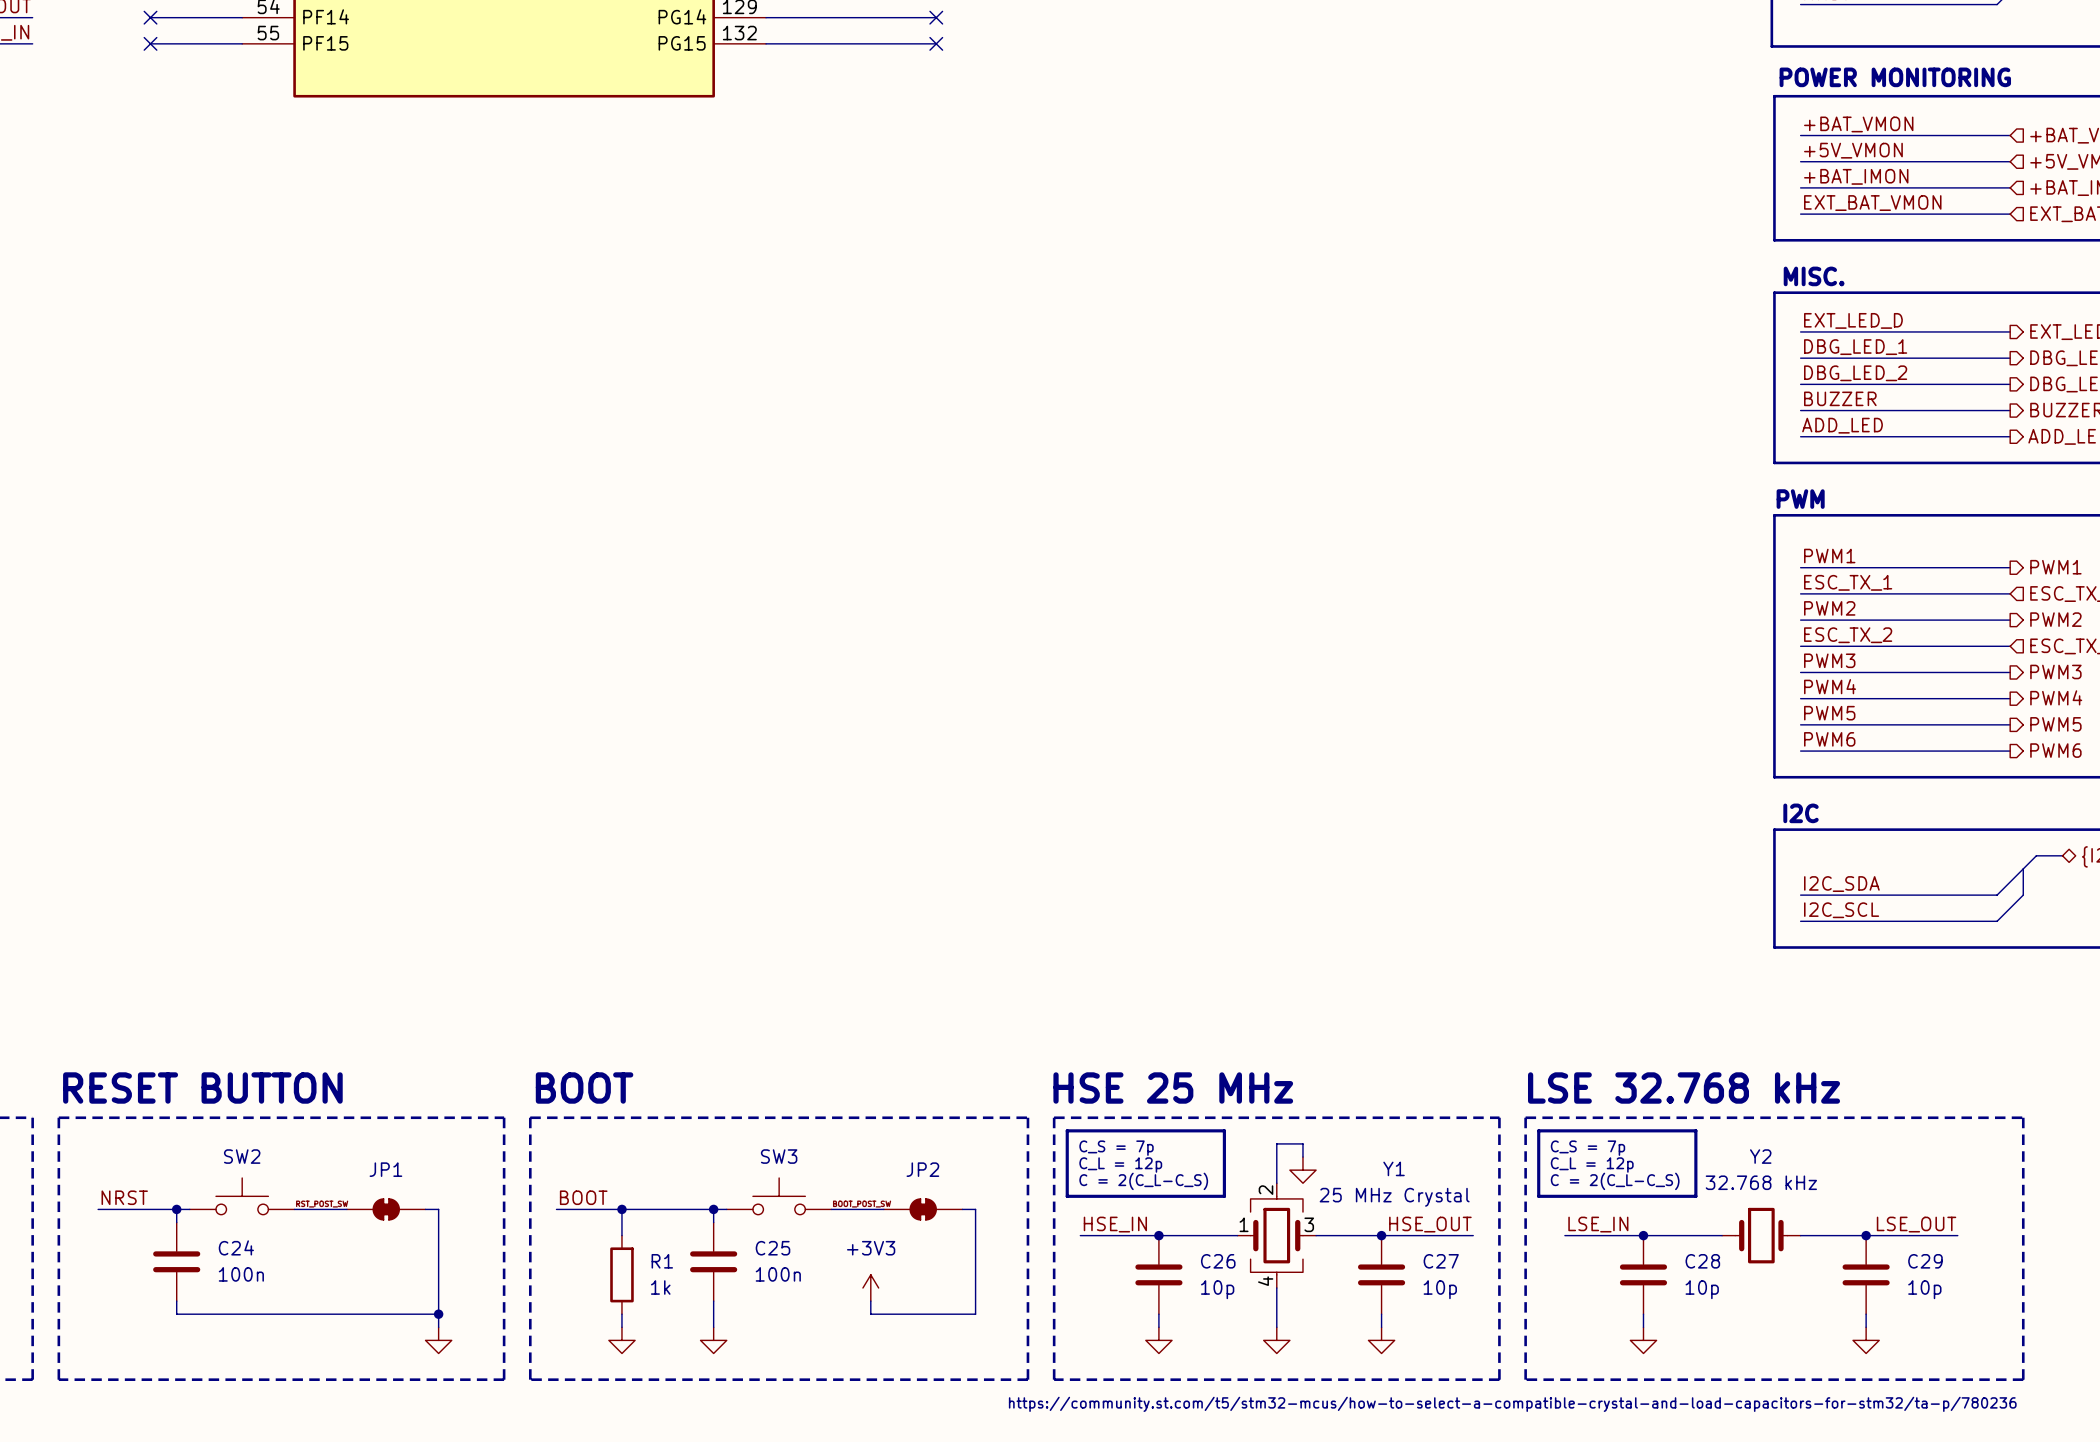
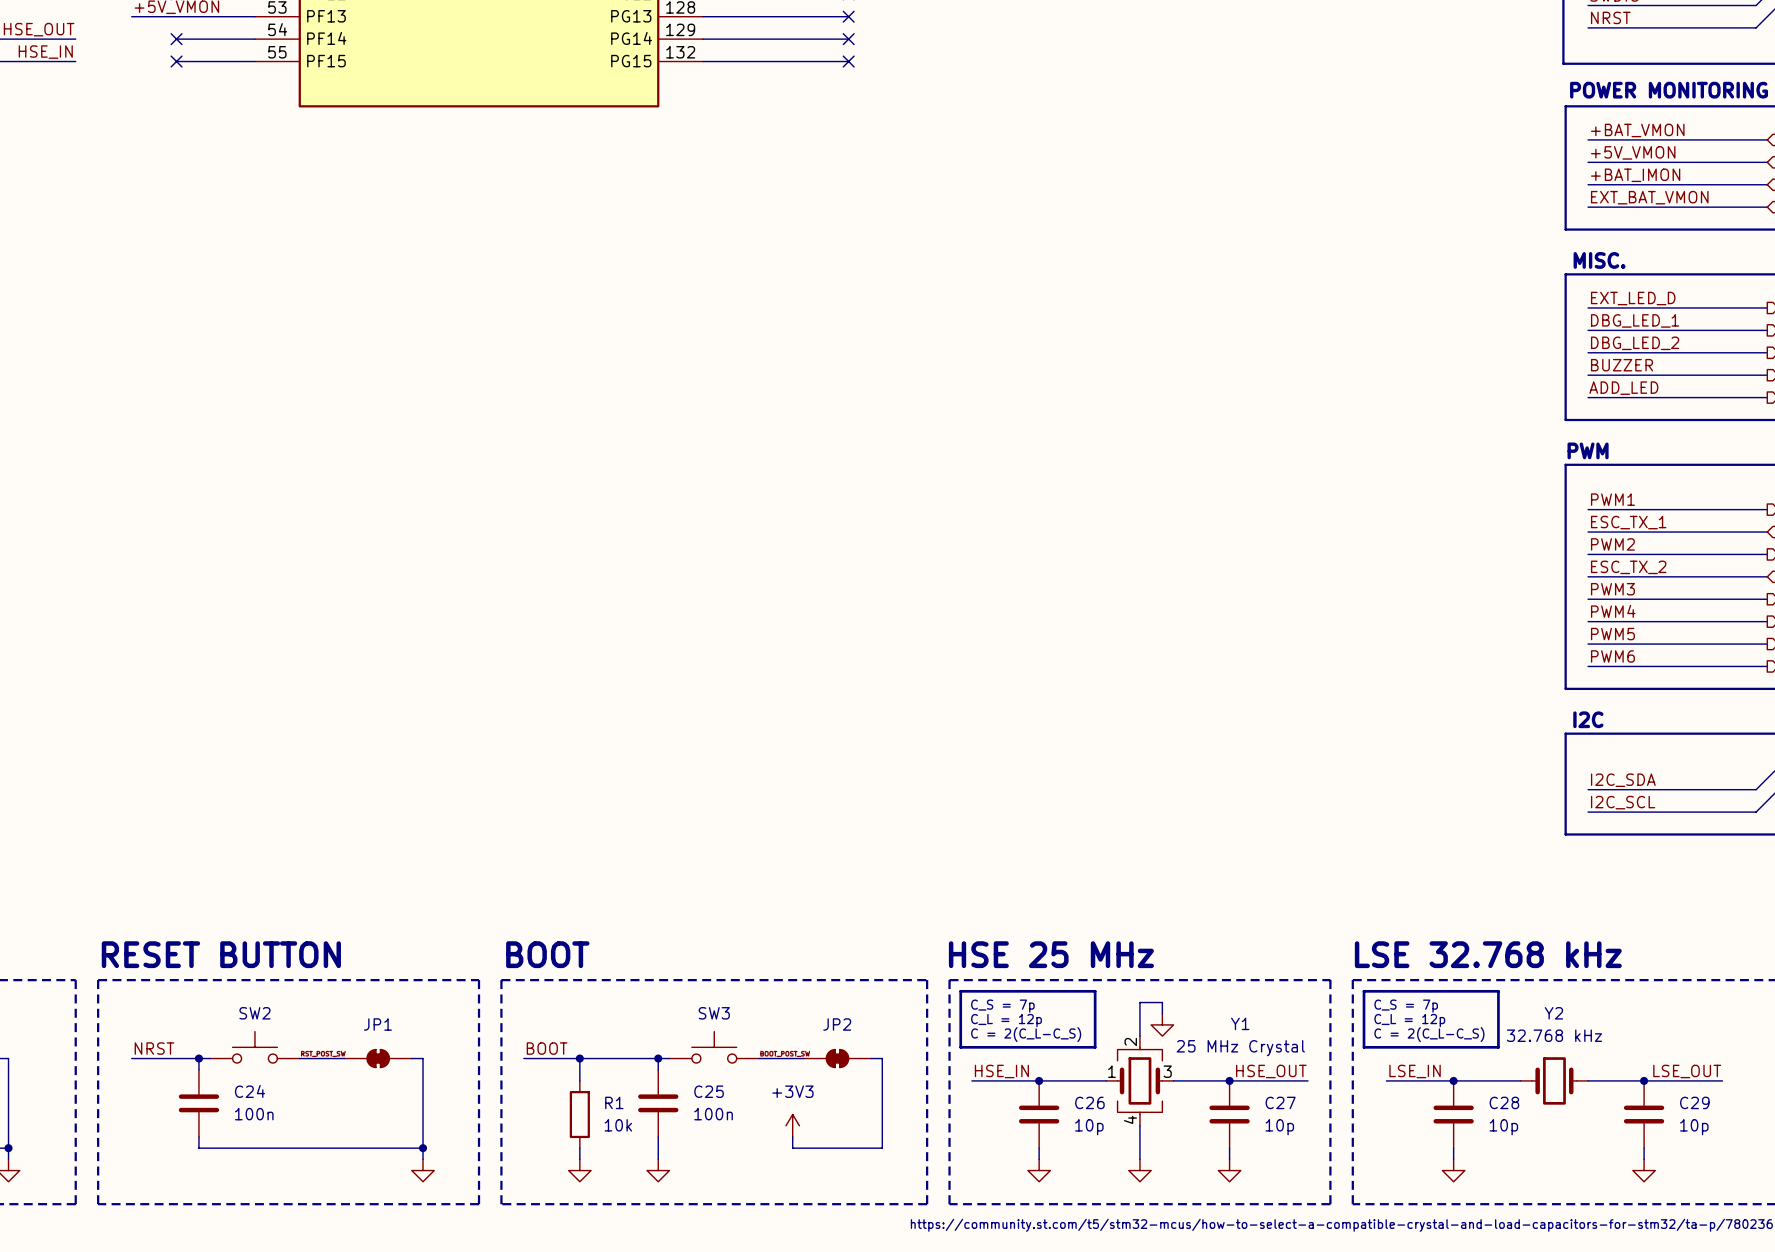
R1 value: 1k (660, 1287) -> 10k (618, 1125)

